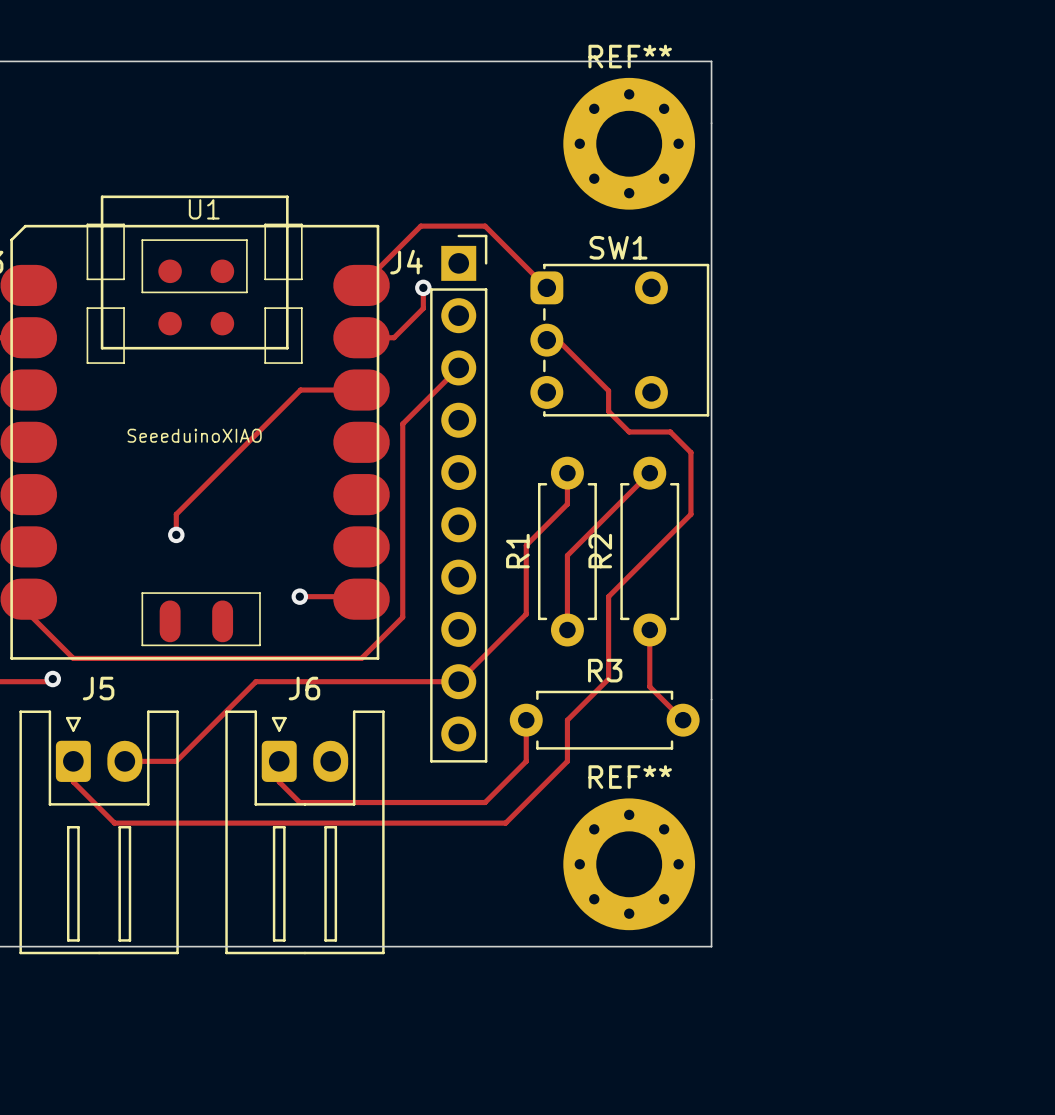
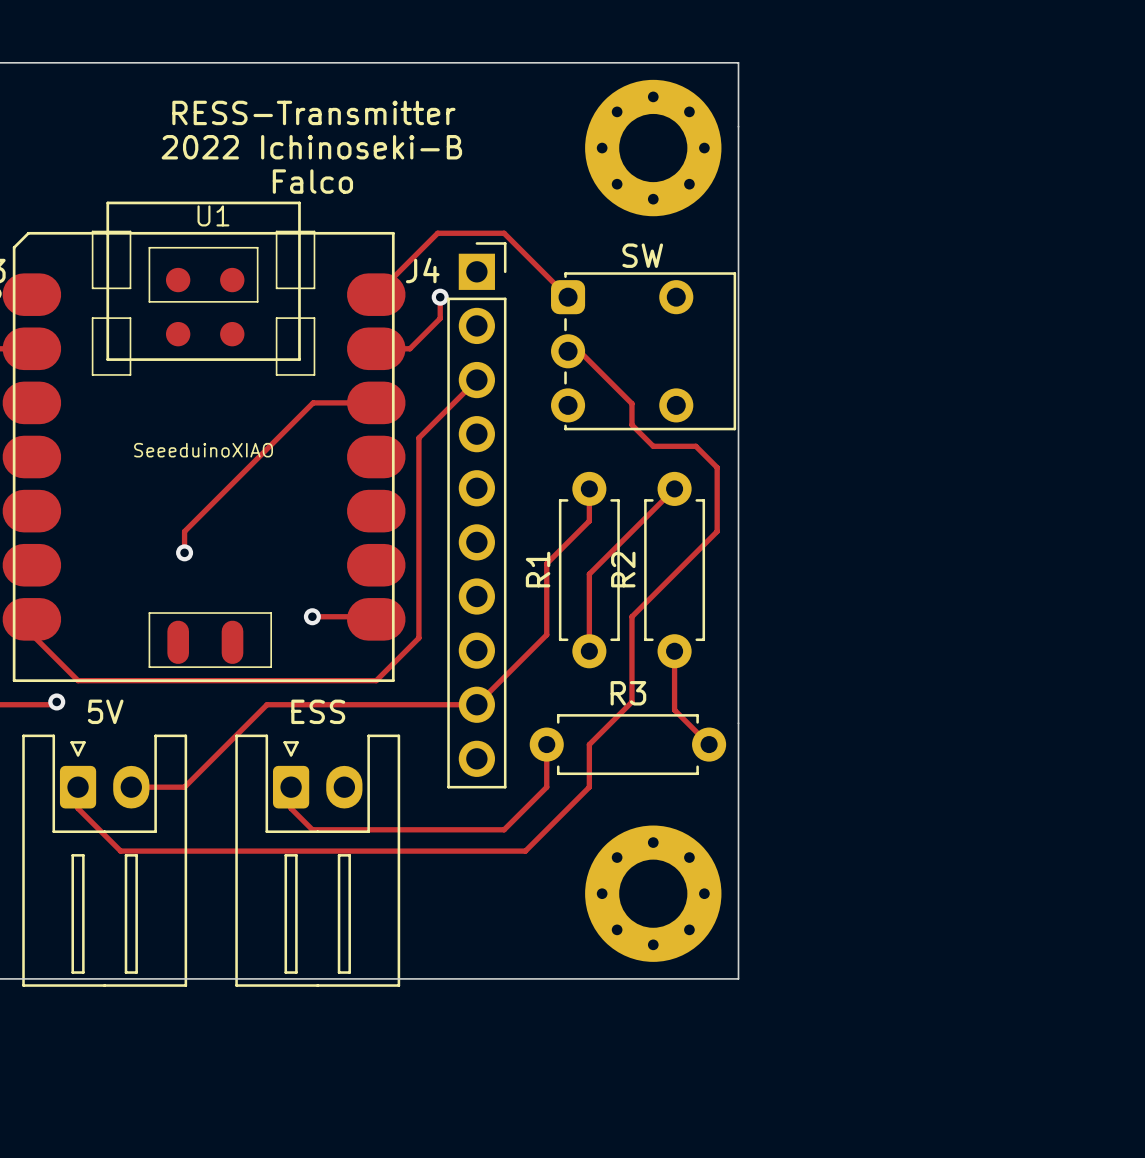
REF** name: REF** (630, 56) -> none
text: none -> RESS-Transmitter (313, 112)
text: none -> 2022 Ichinoseki-B (311, 147)
text: none -> Falco (312, 181)
SW1 name: SW1 (618, 247) -> SW (642, 255)
J5 name: J5 (98, 688) -> 5V (105, 711)
J6 name: J6 (304, 688) -> ESS (318, 711)
REF** name: REF** (630, 777) -> none

